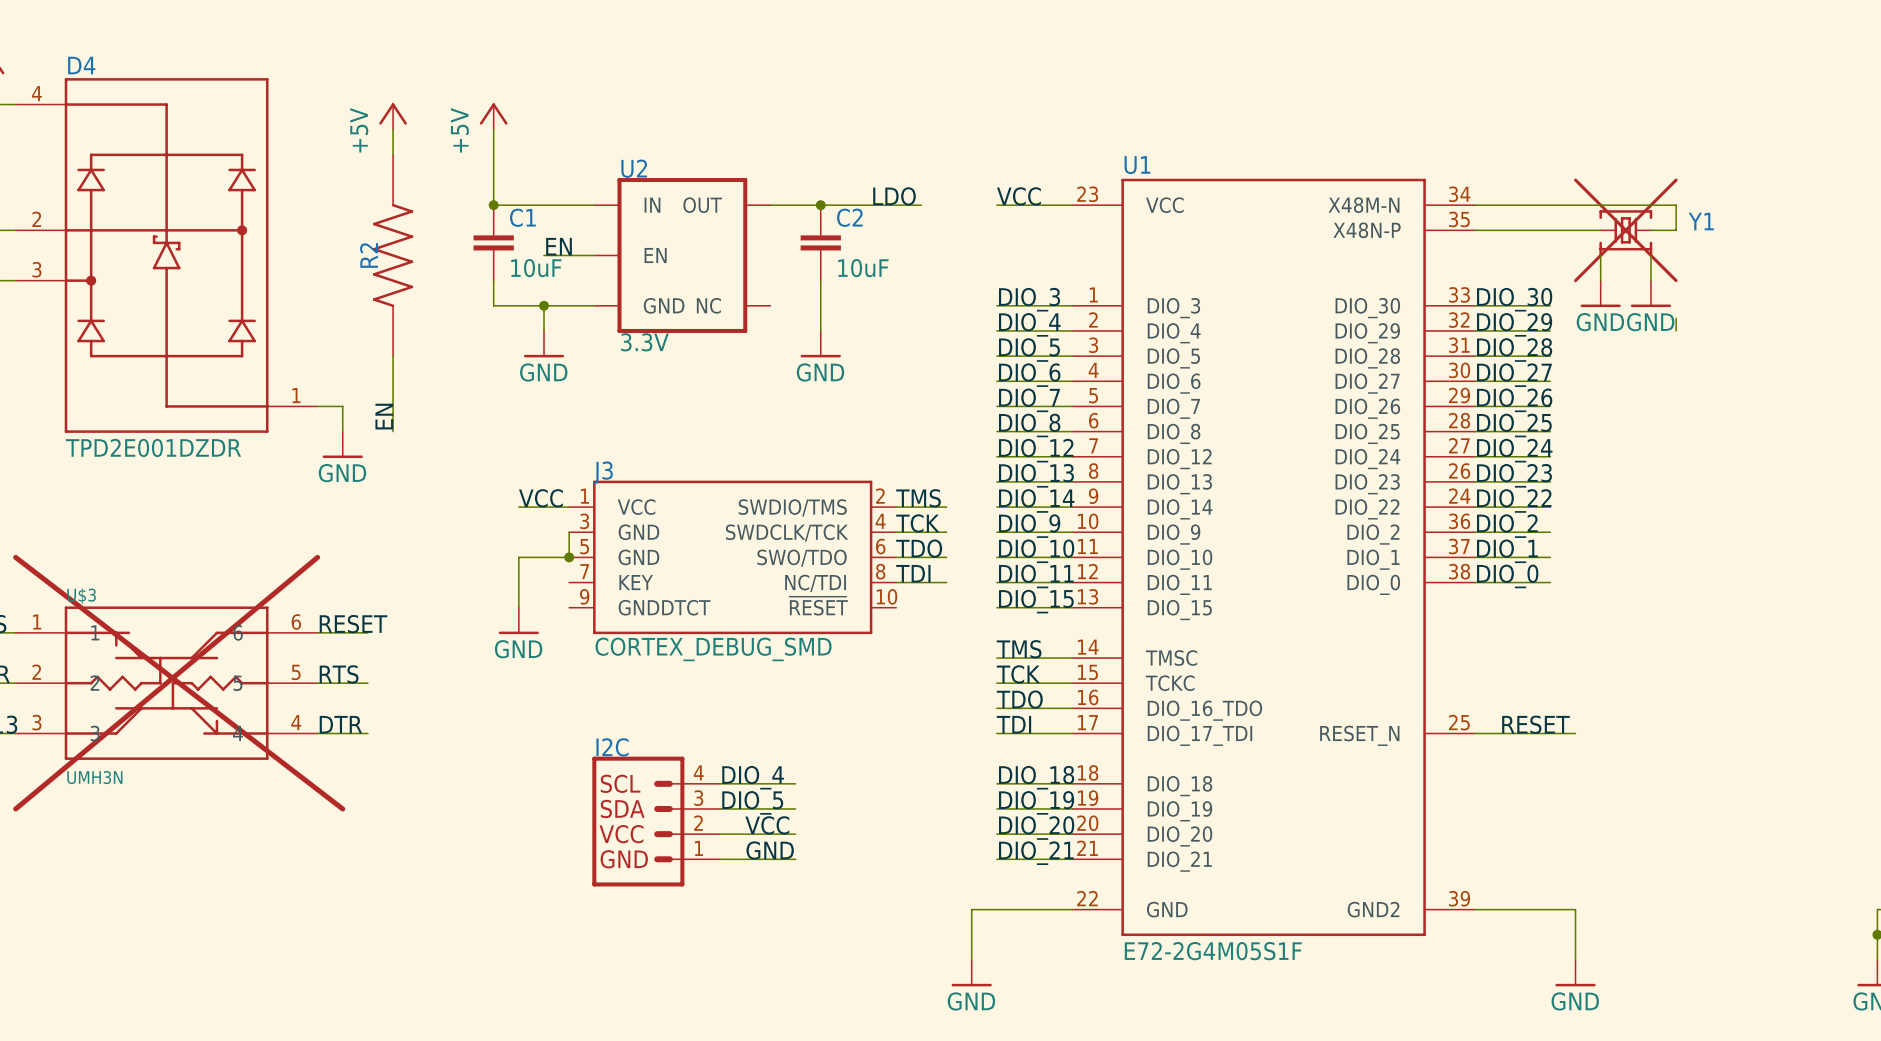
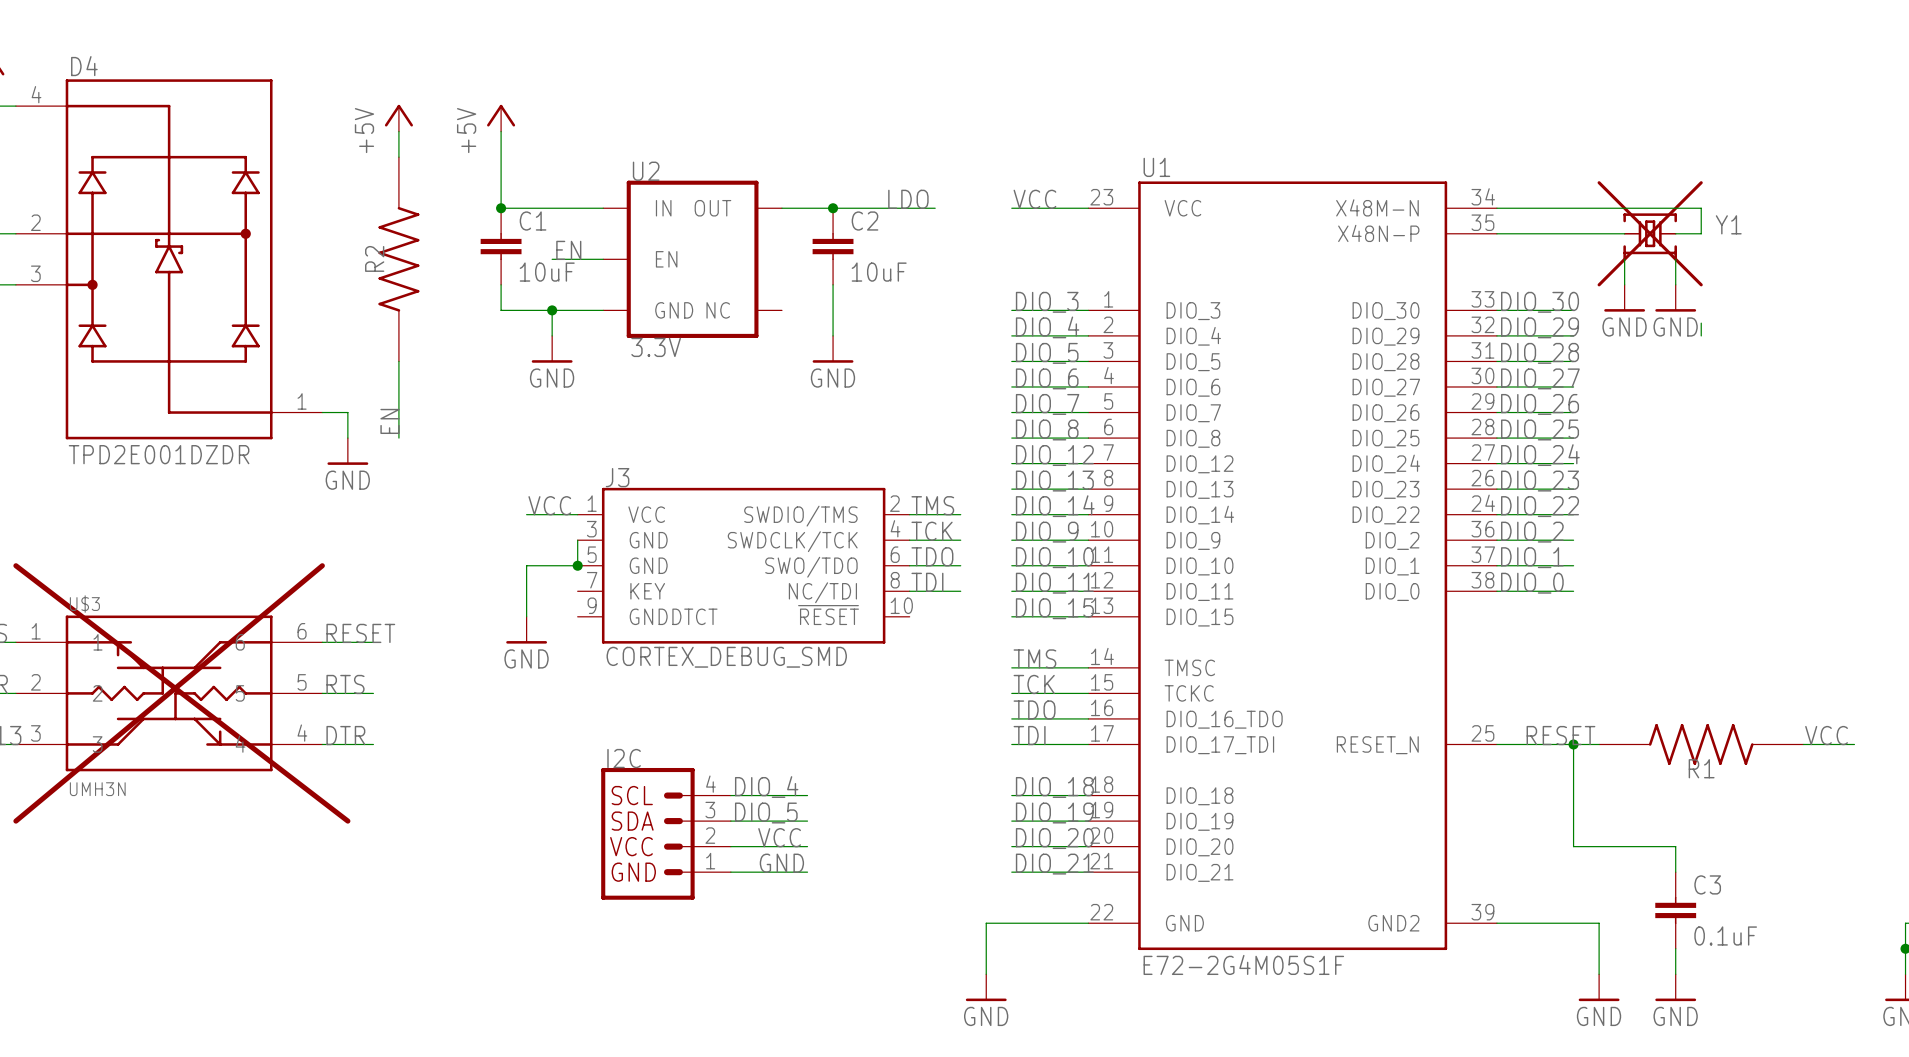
label: none -> VCC (1826, 735)
wire: none -> (1573, 744) (1573, 846) (1675, 846) (1675, 872)
junction: none -> (1573, 744)
R1: none -> (1701, 744)
wire: none -> (1803, 744) (1854, 744)
C3: none -> 0.1uF (1675, 910)
wire: none -> (1675, 948) (1675, 974)
power symbol: none -> GND (1675, 987)

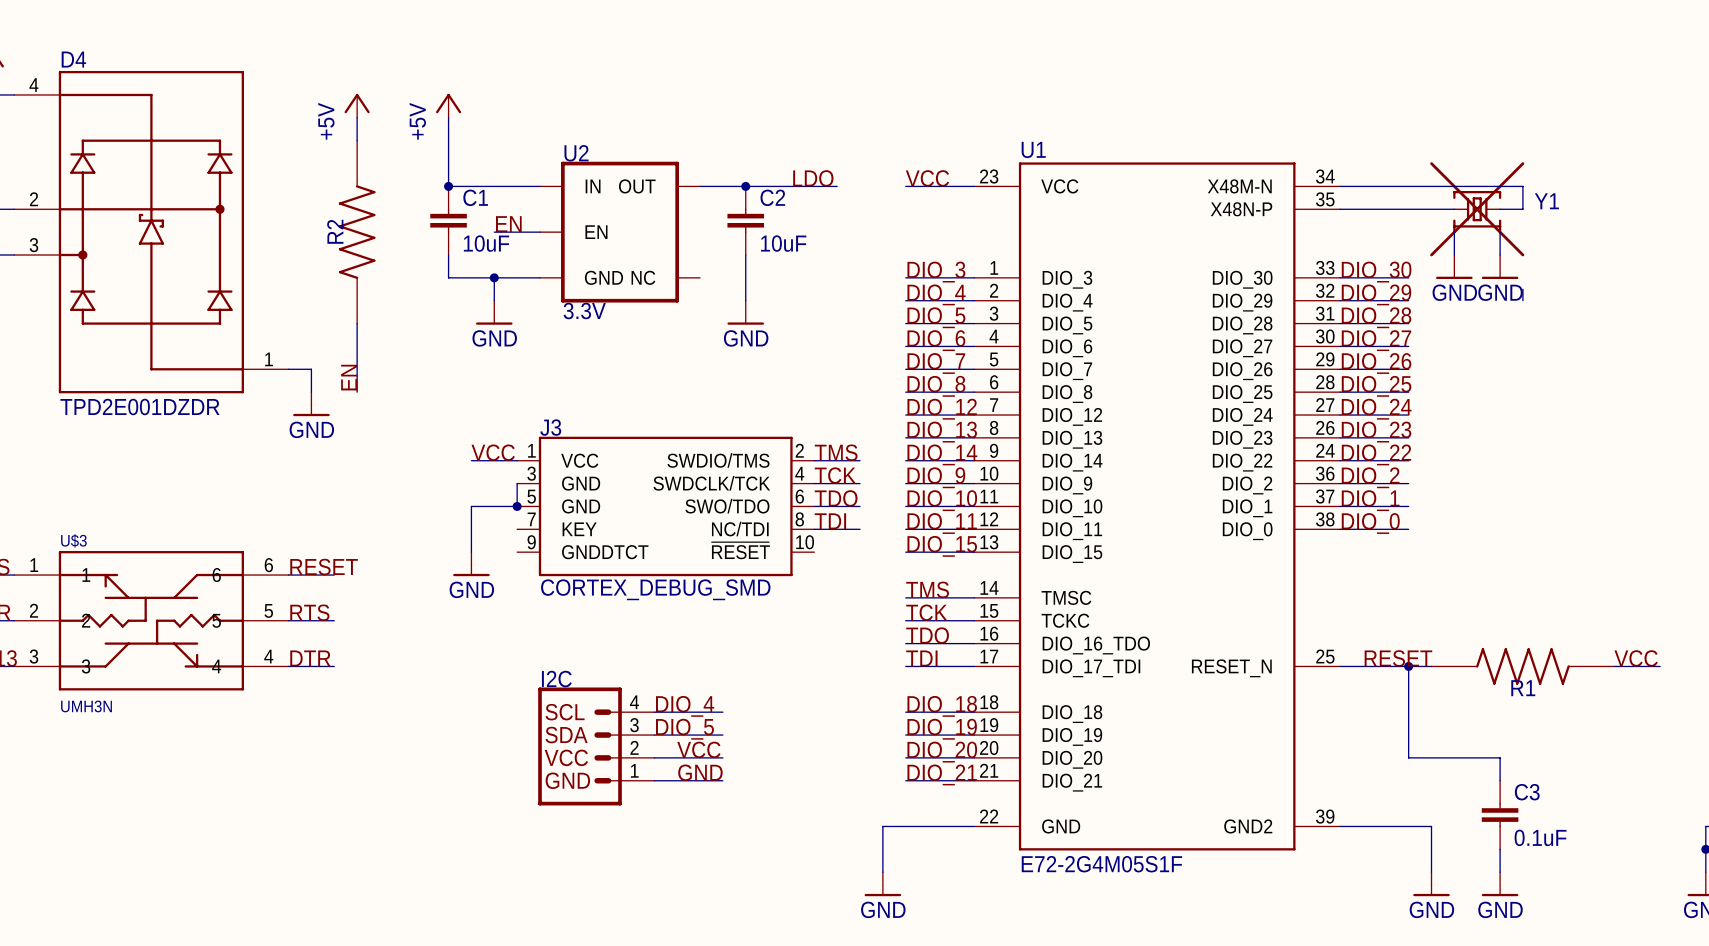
line: (15, 565) (347, 821) -> none
line: (322, 565) (15, 821) -> none

